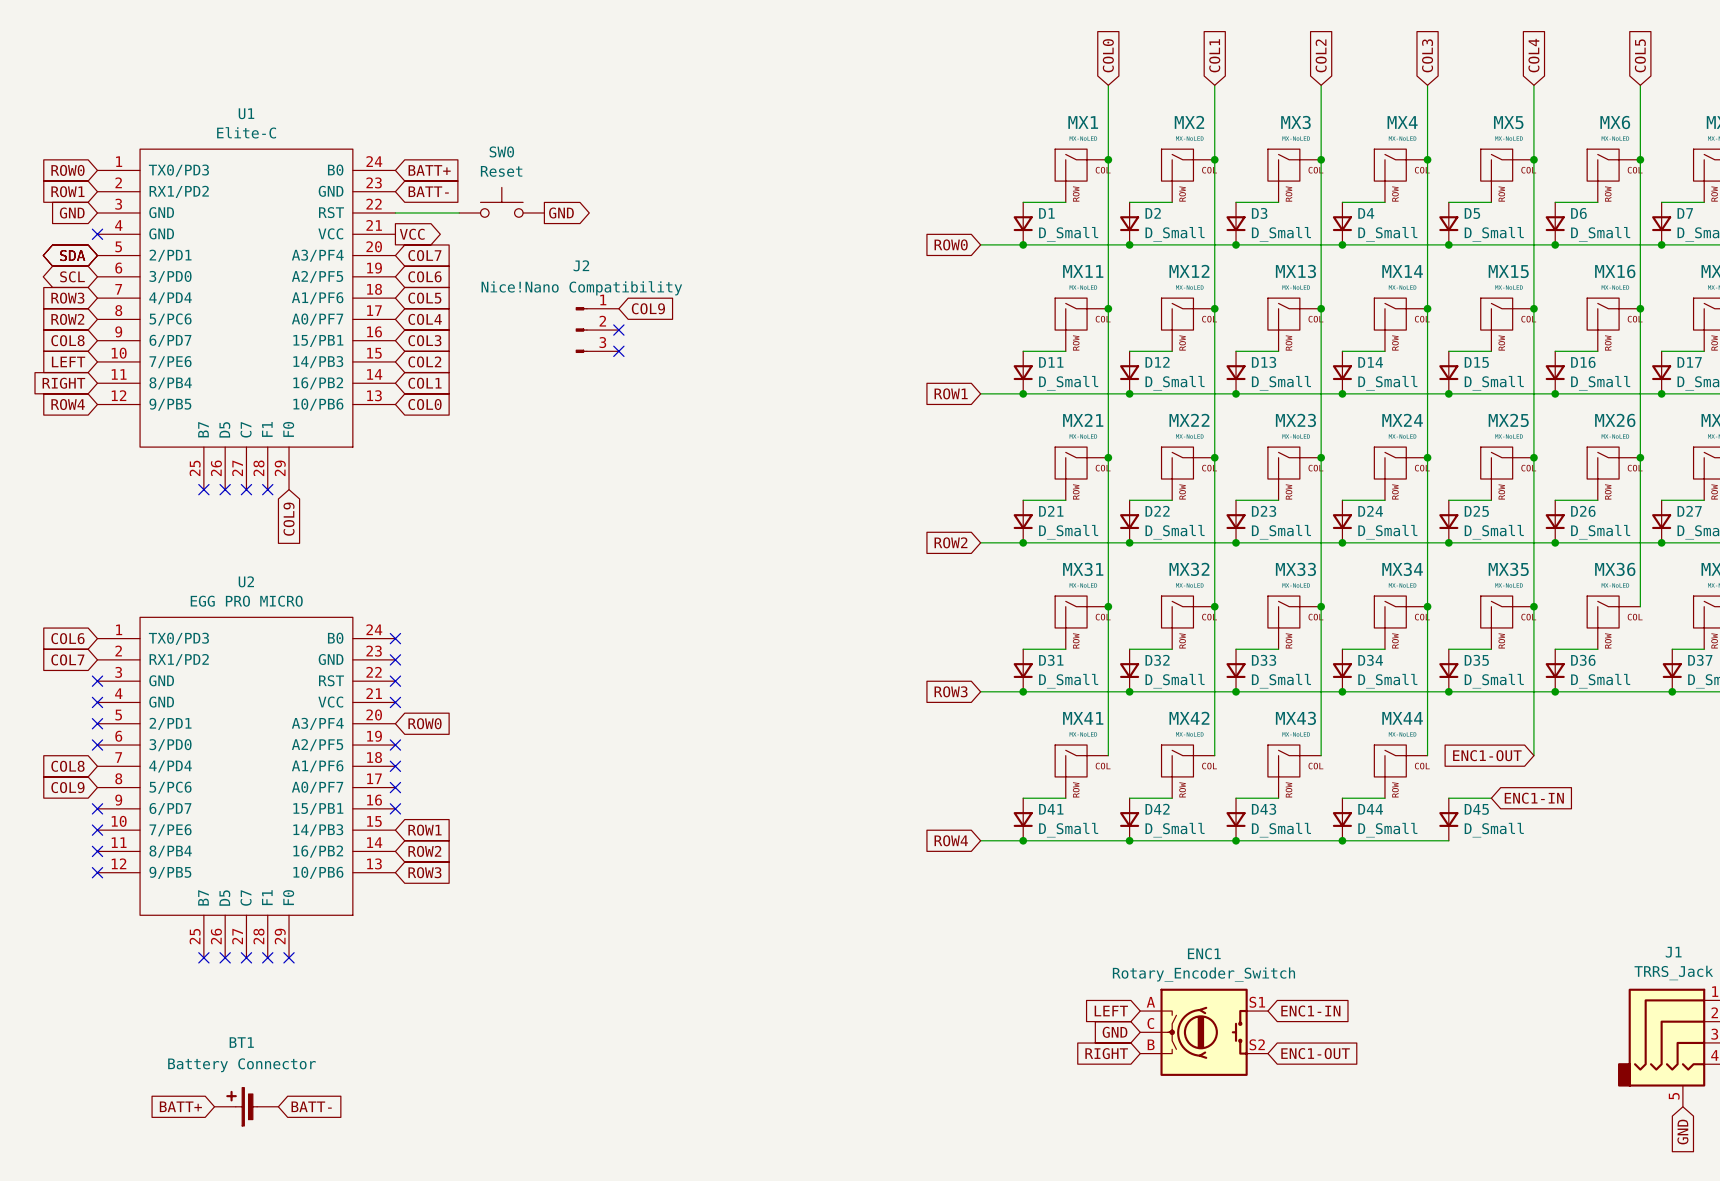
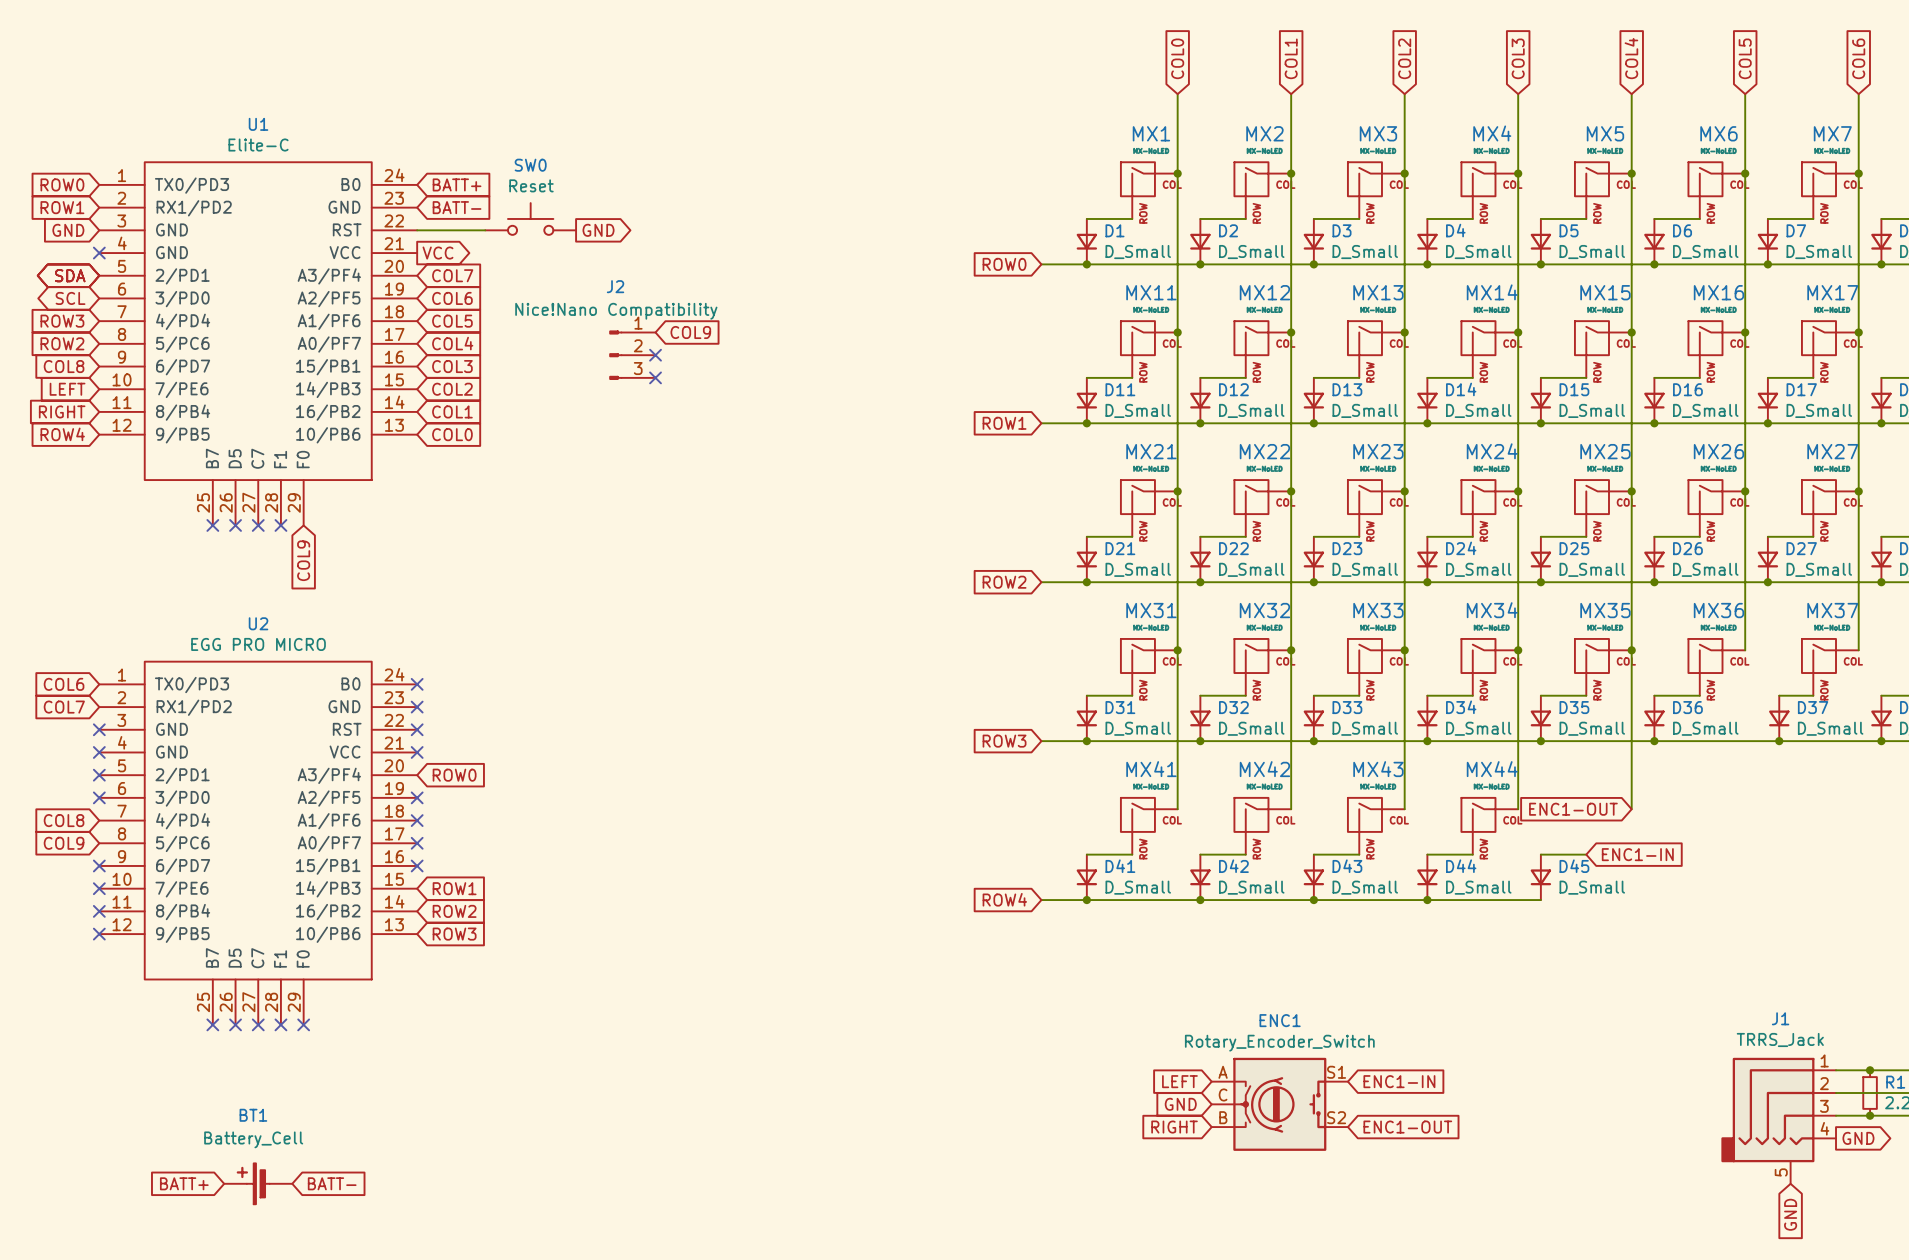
BT1 value: Battery Connector (241, 1065) -> Battery_Cell (253, 1139)

